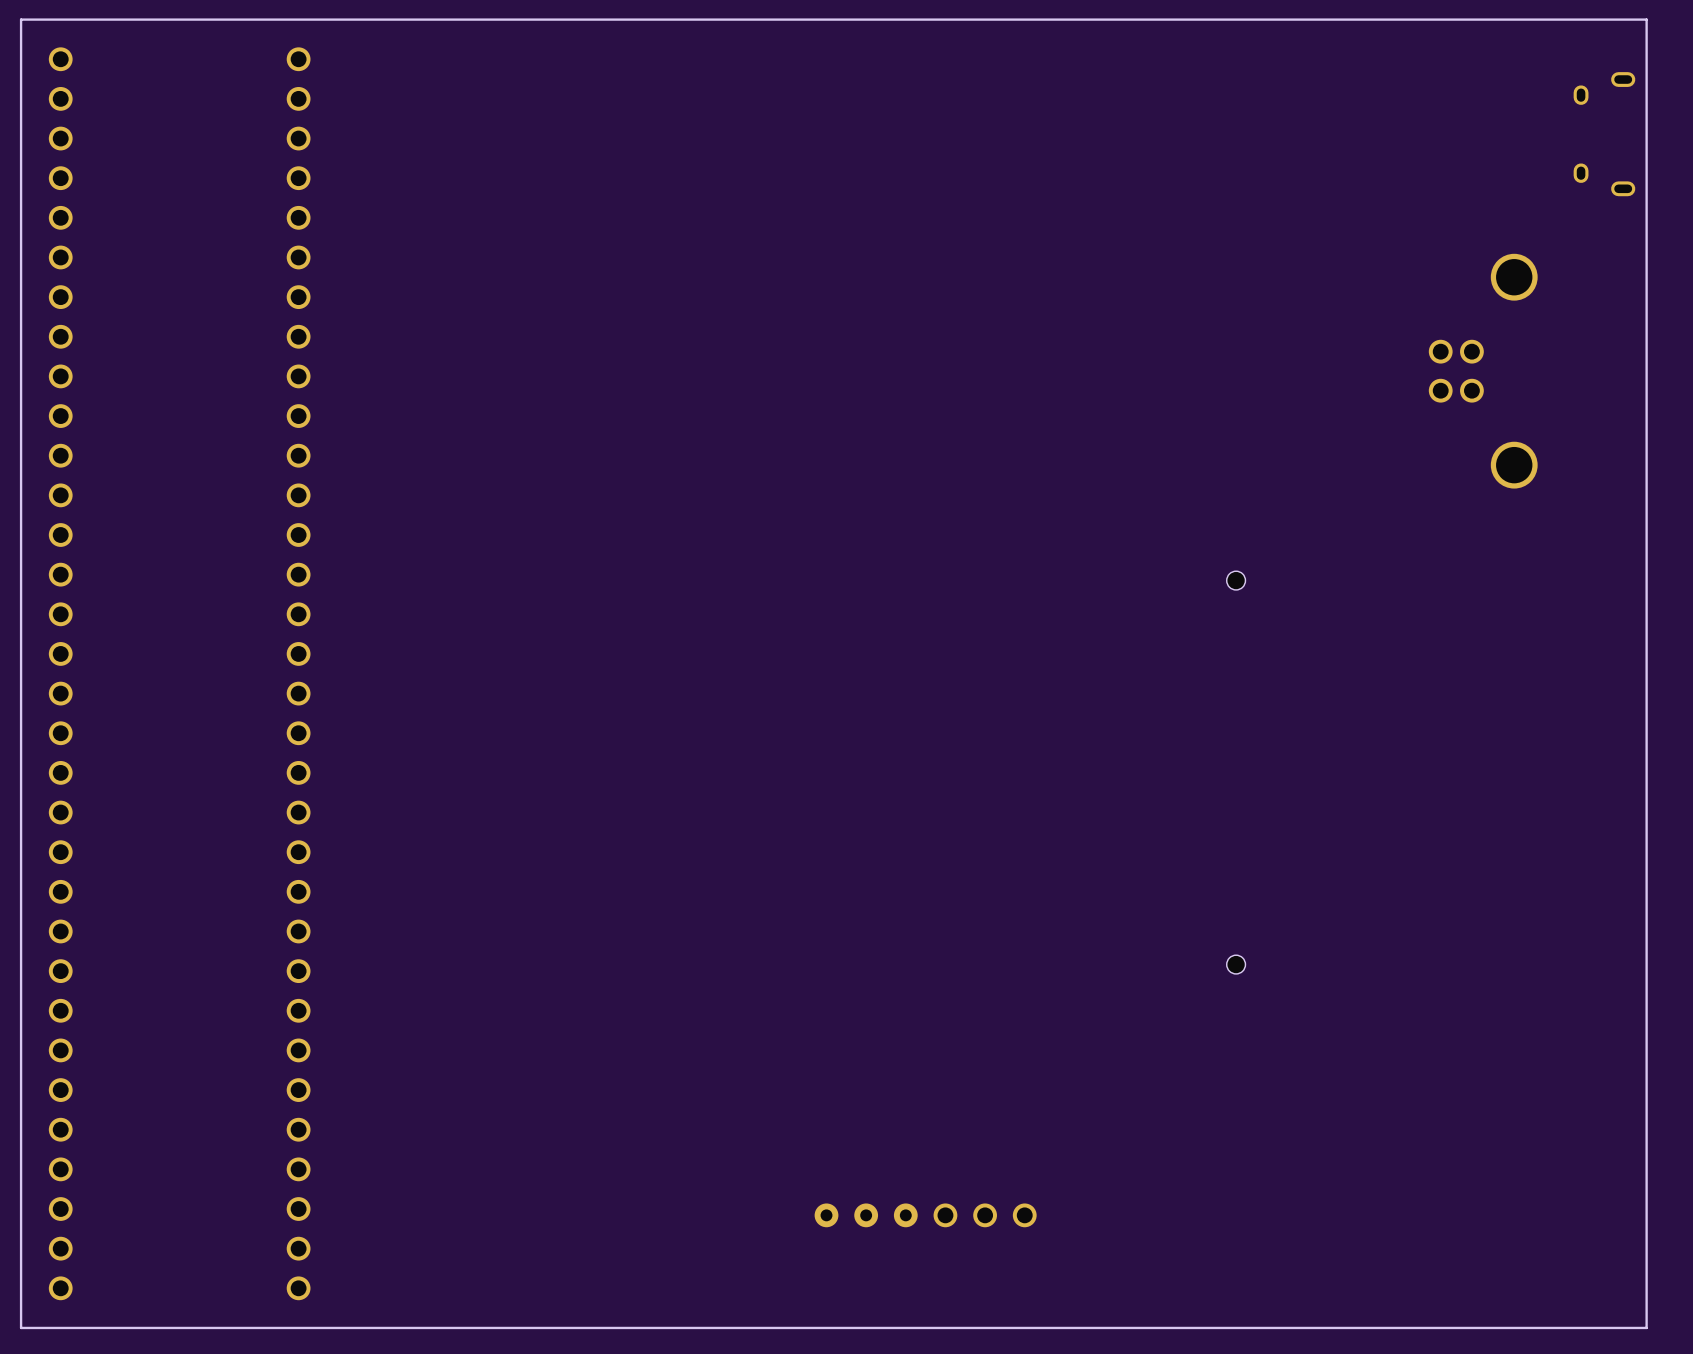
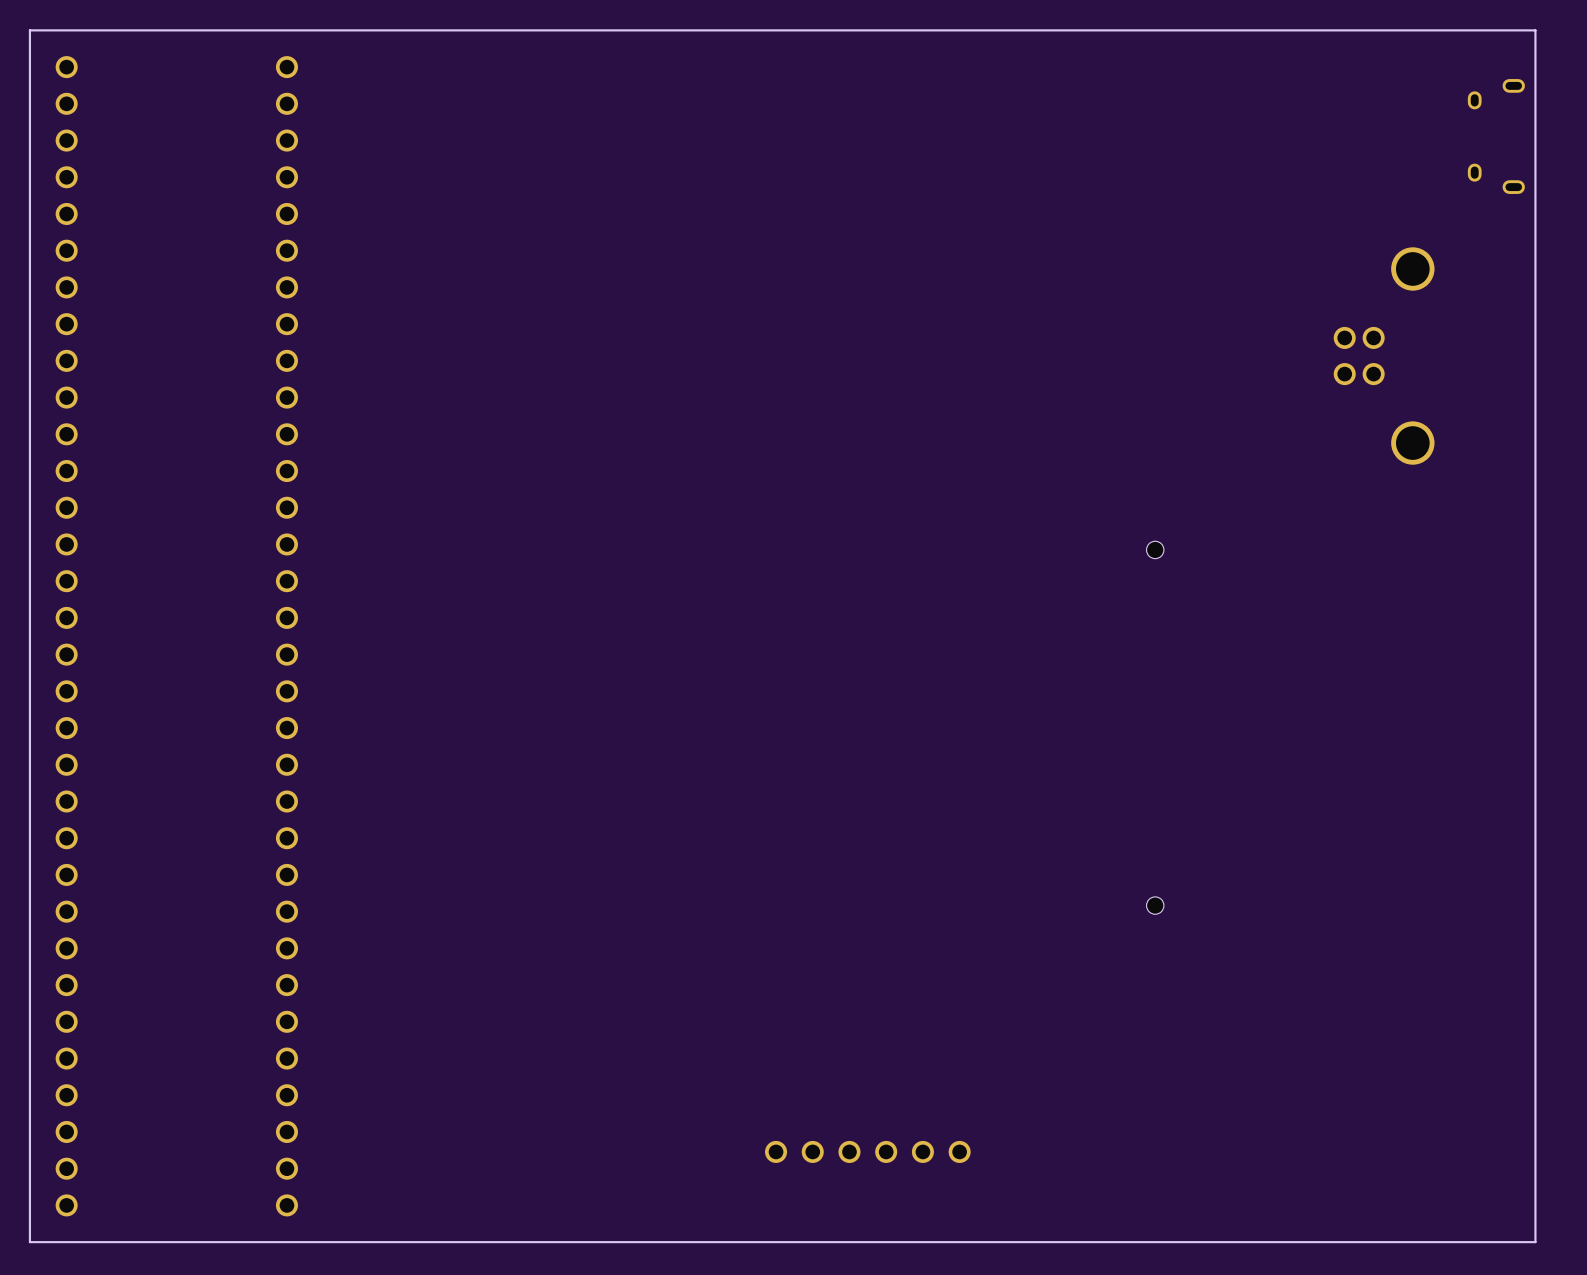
part footprint: [814, 1203, 1037, 1228] -> [765, 1140, 971, 1163]

